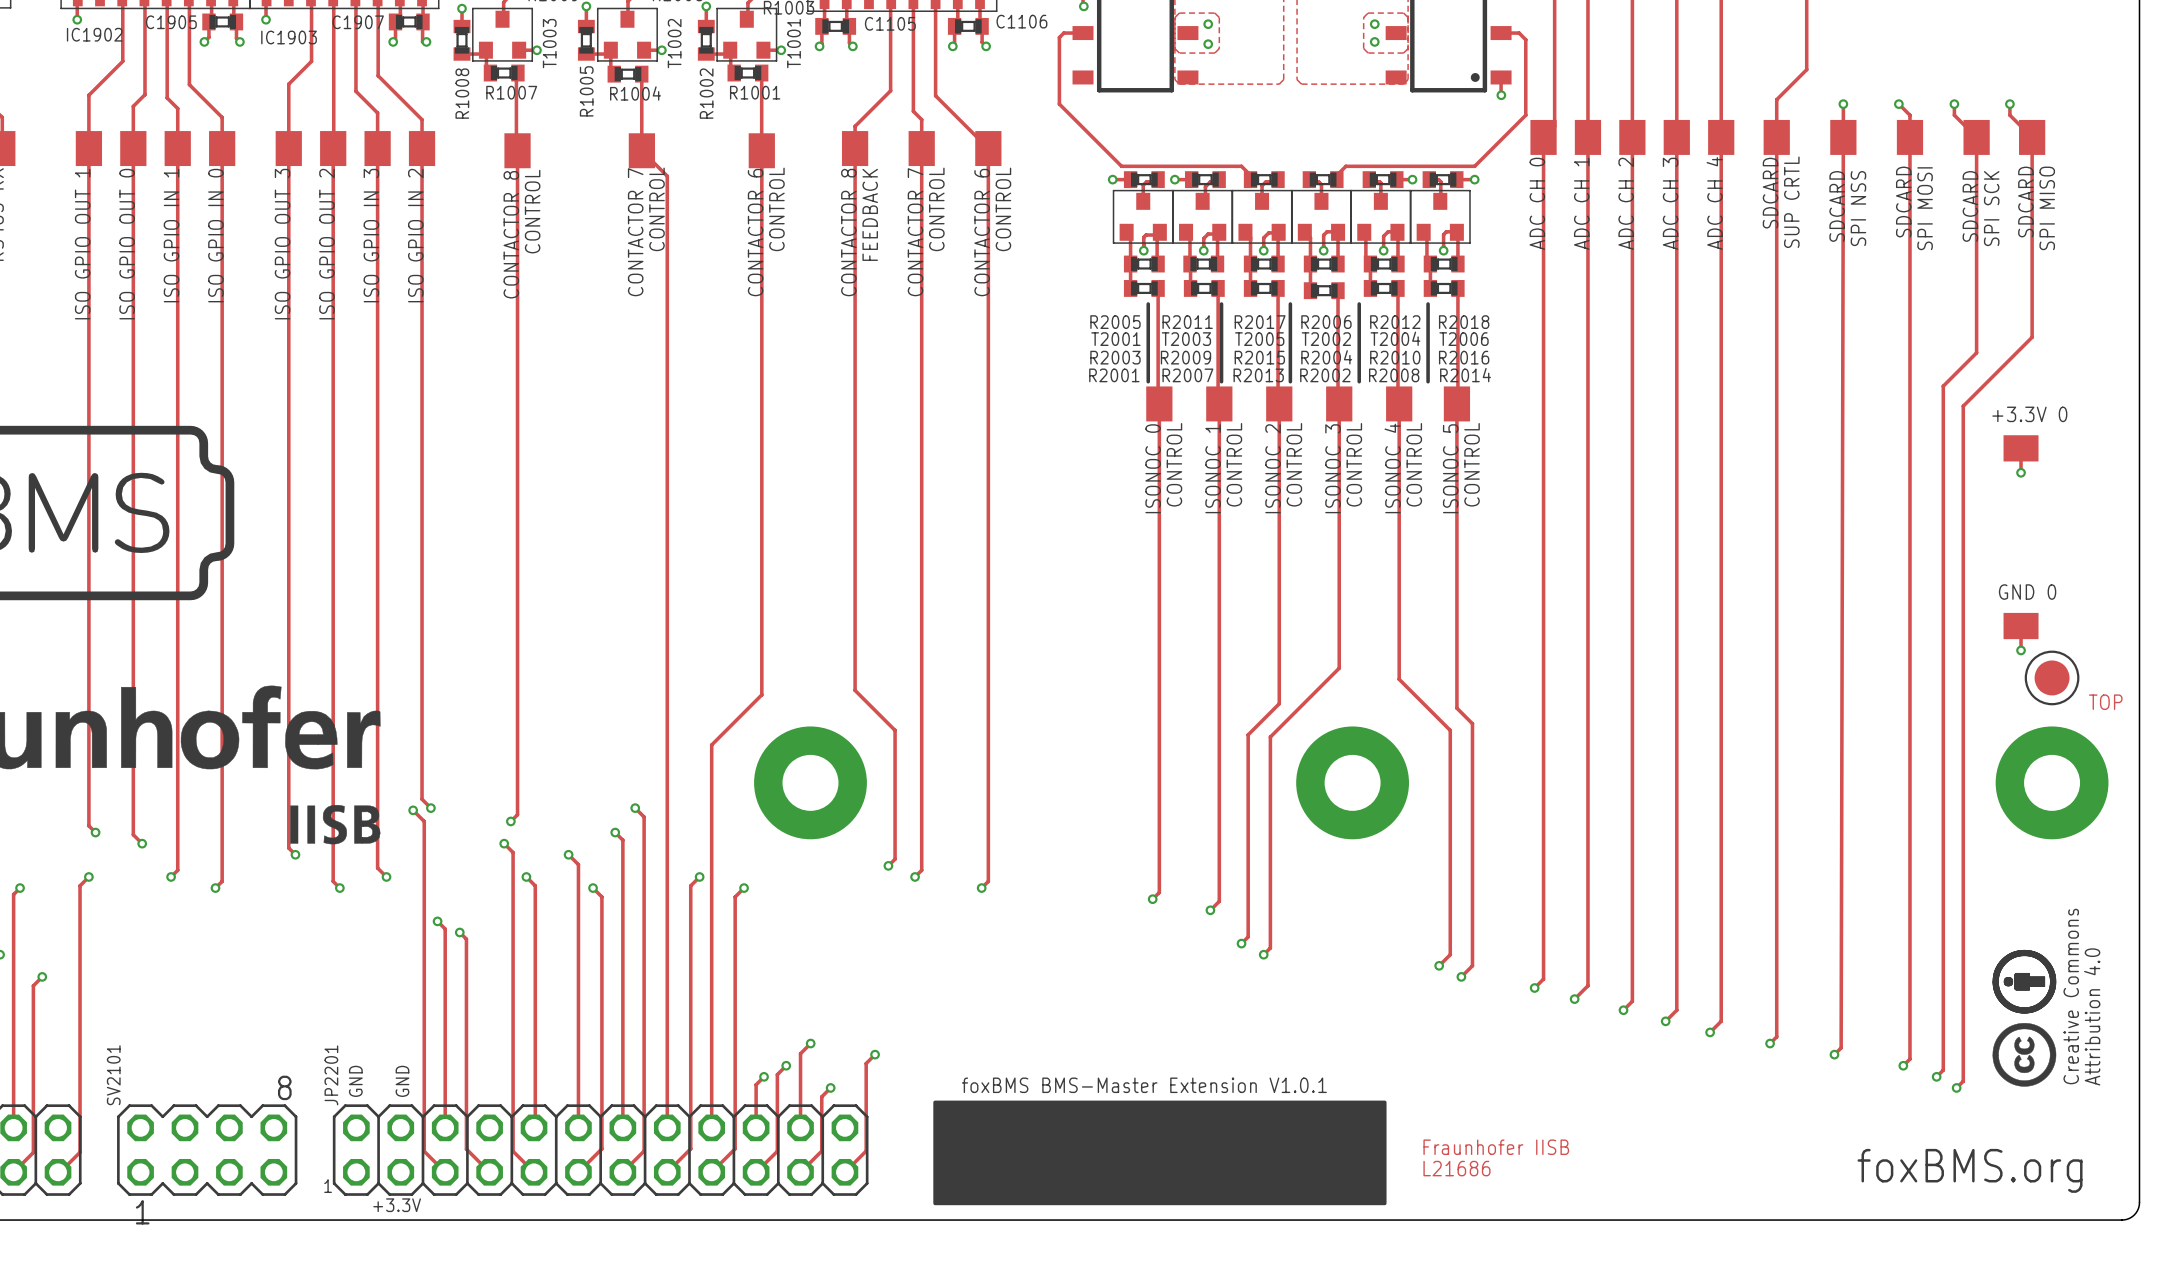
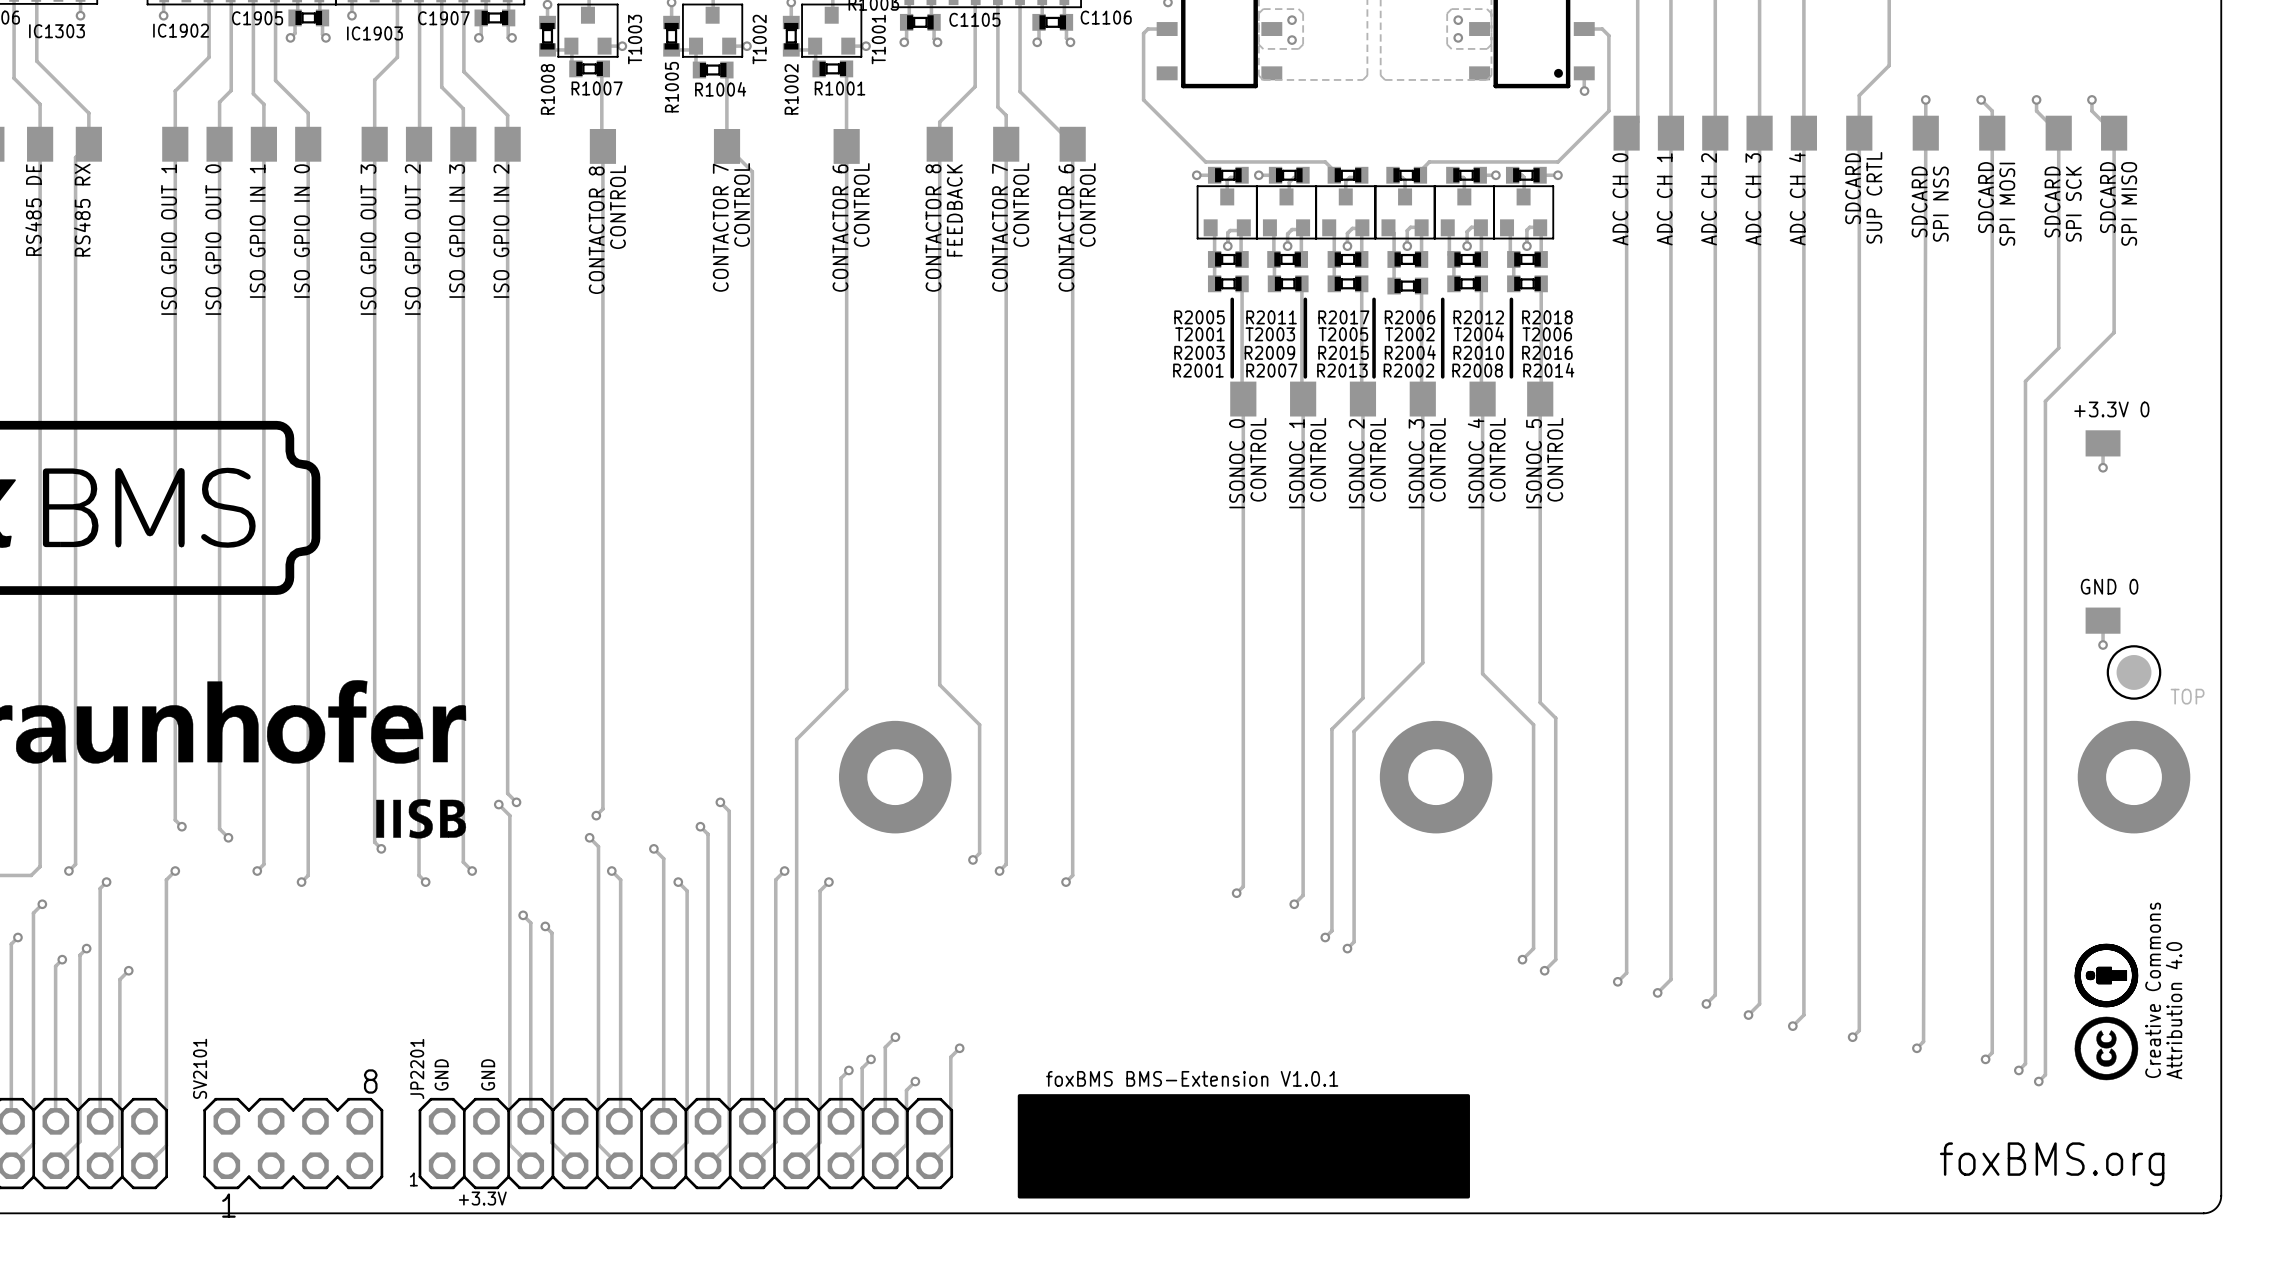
text: foxBMS BMS-Master Extension V1.0.1 (1144, 1085) -> foxBMS BMS-Extension V1.0.1 (1192, 1078)
text: Fraunhofer IISB (1496, 1147) -> none
text: L21686 (1456, 1168) -> none

